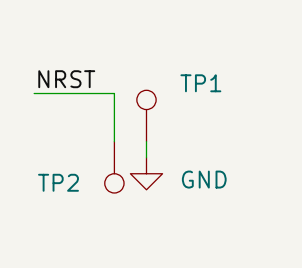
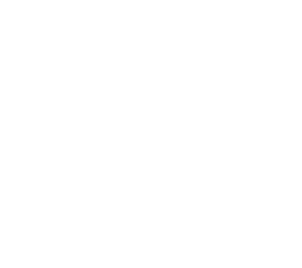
label: NRST (66, 79) -> none
wire: (34, 93) (114, 93) (114, 141) -> none
TP1: (146, 115) -> none
wire: (146, 141) (146, 157) -> none
TP2: (114, 167) -> none
power symbol: GND (146, 173) -> none

